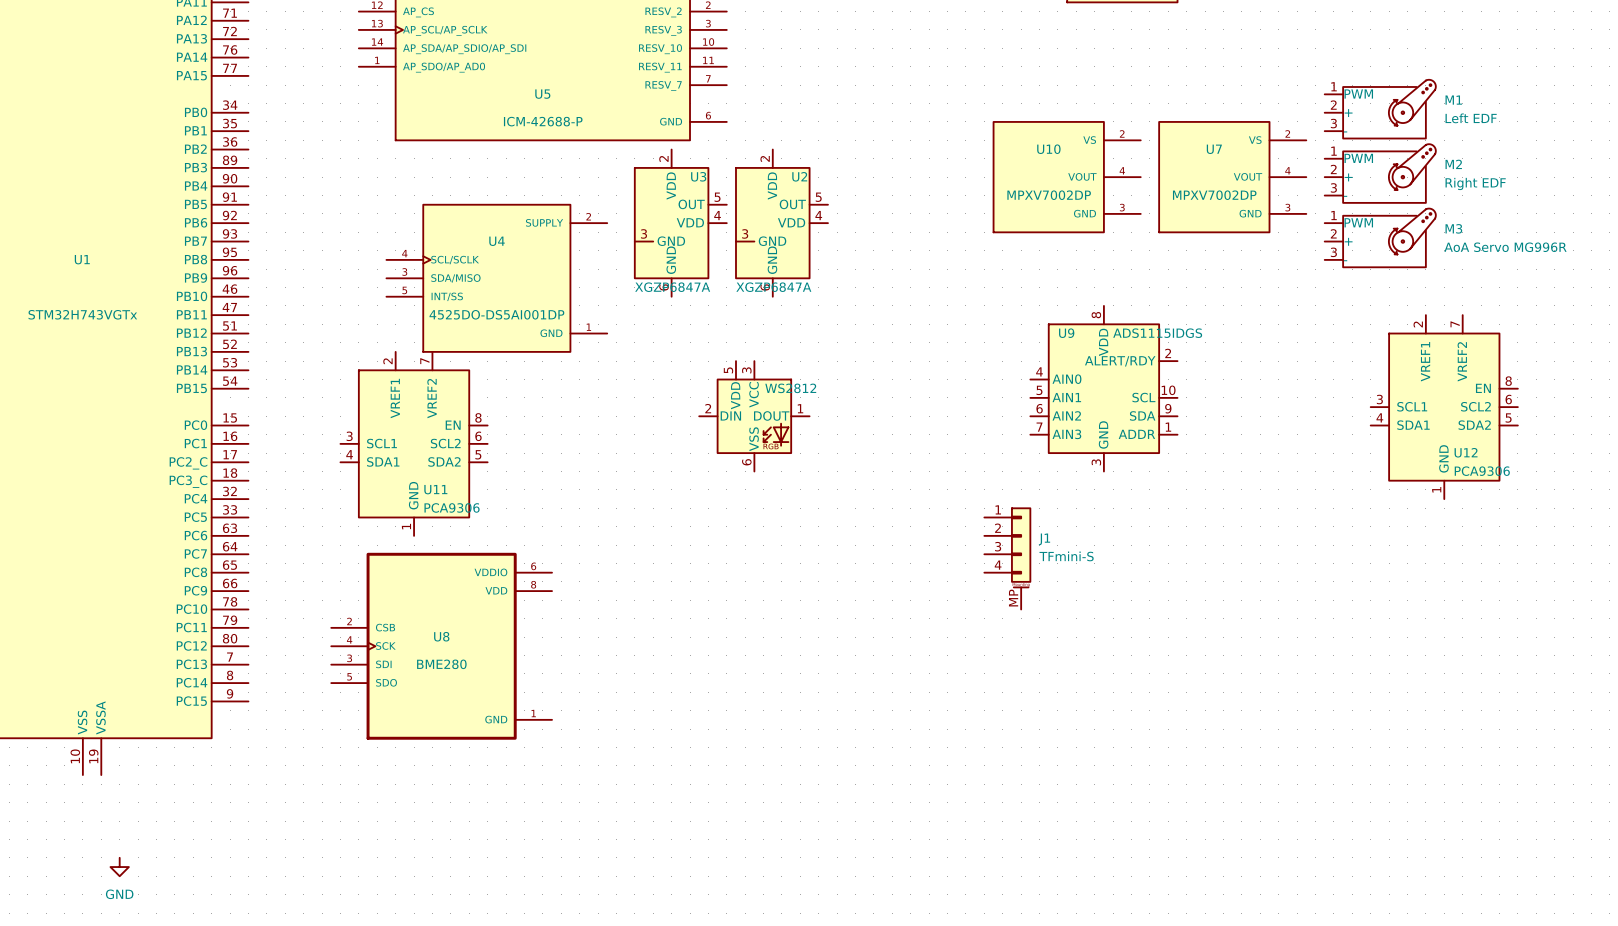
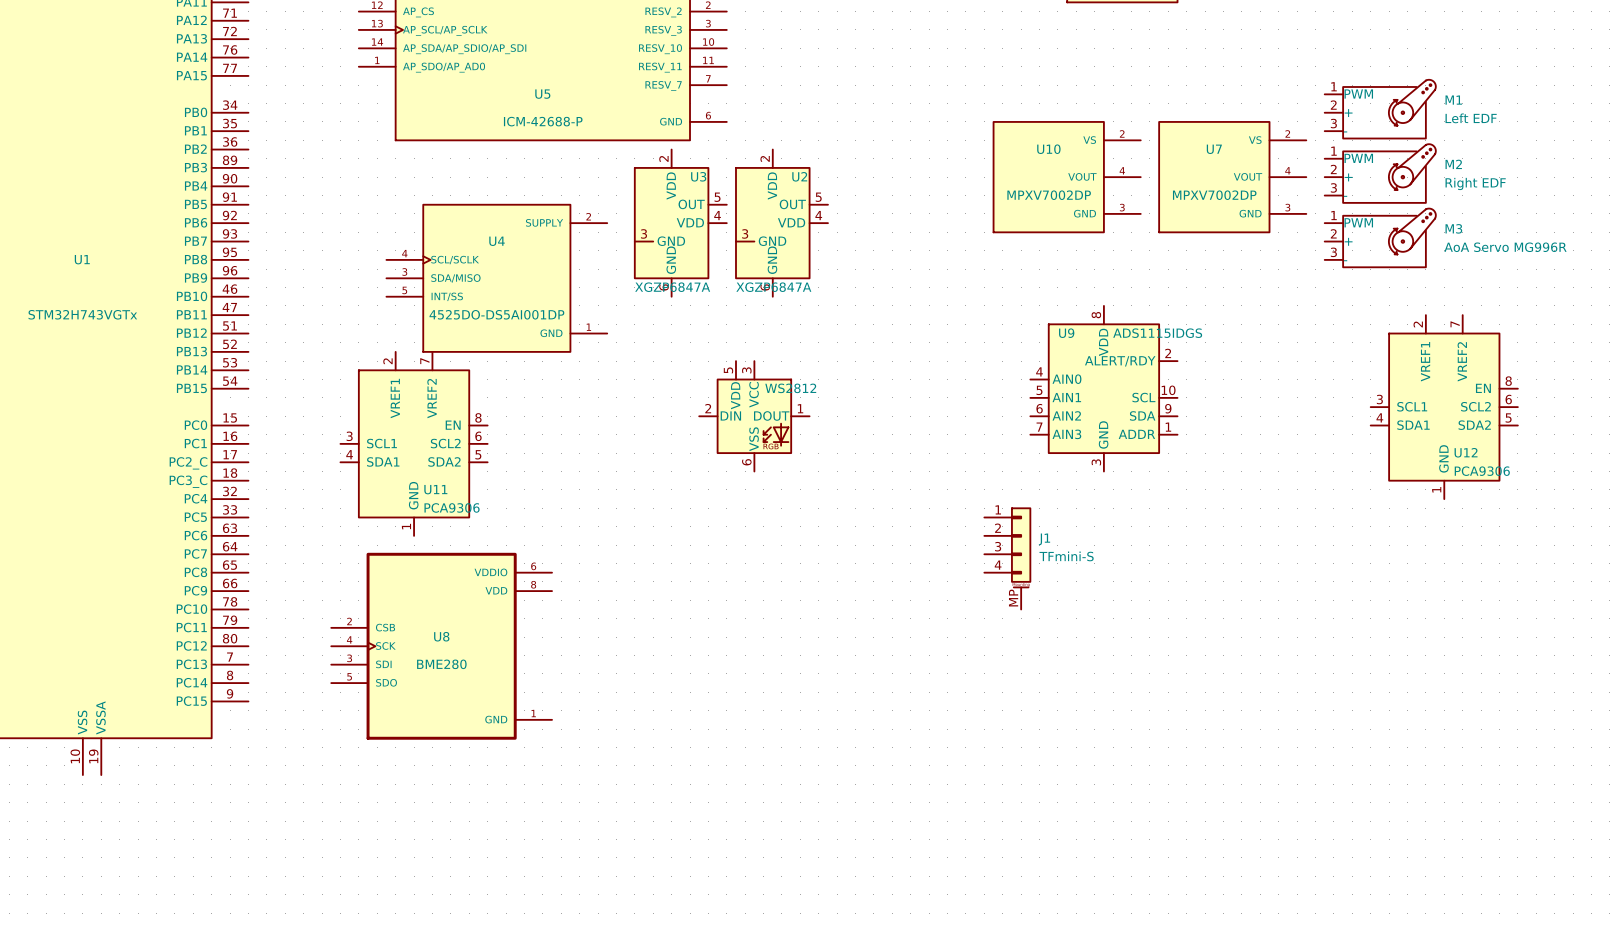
power symbol: GND (119, 867) -> none

